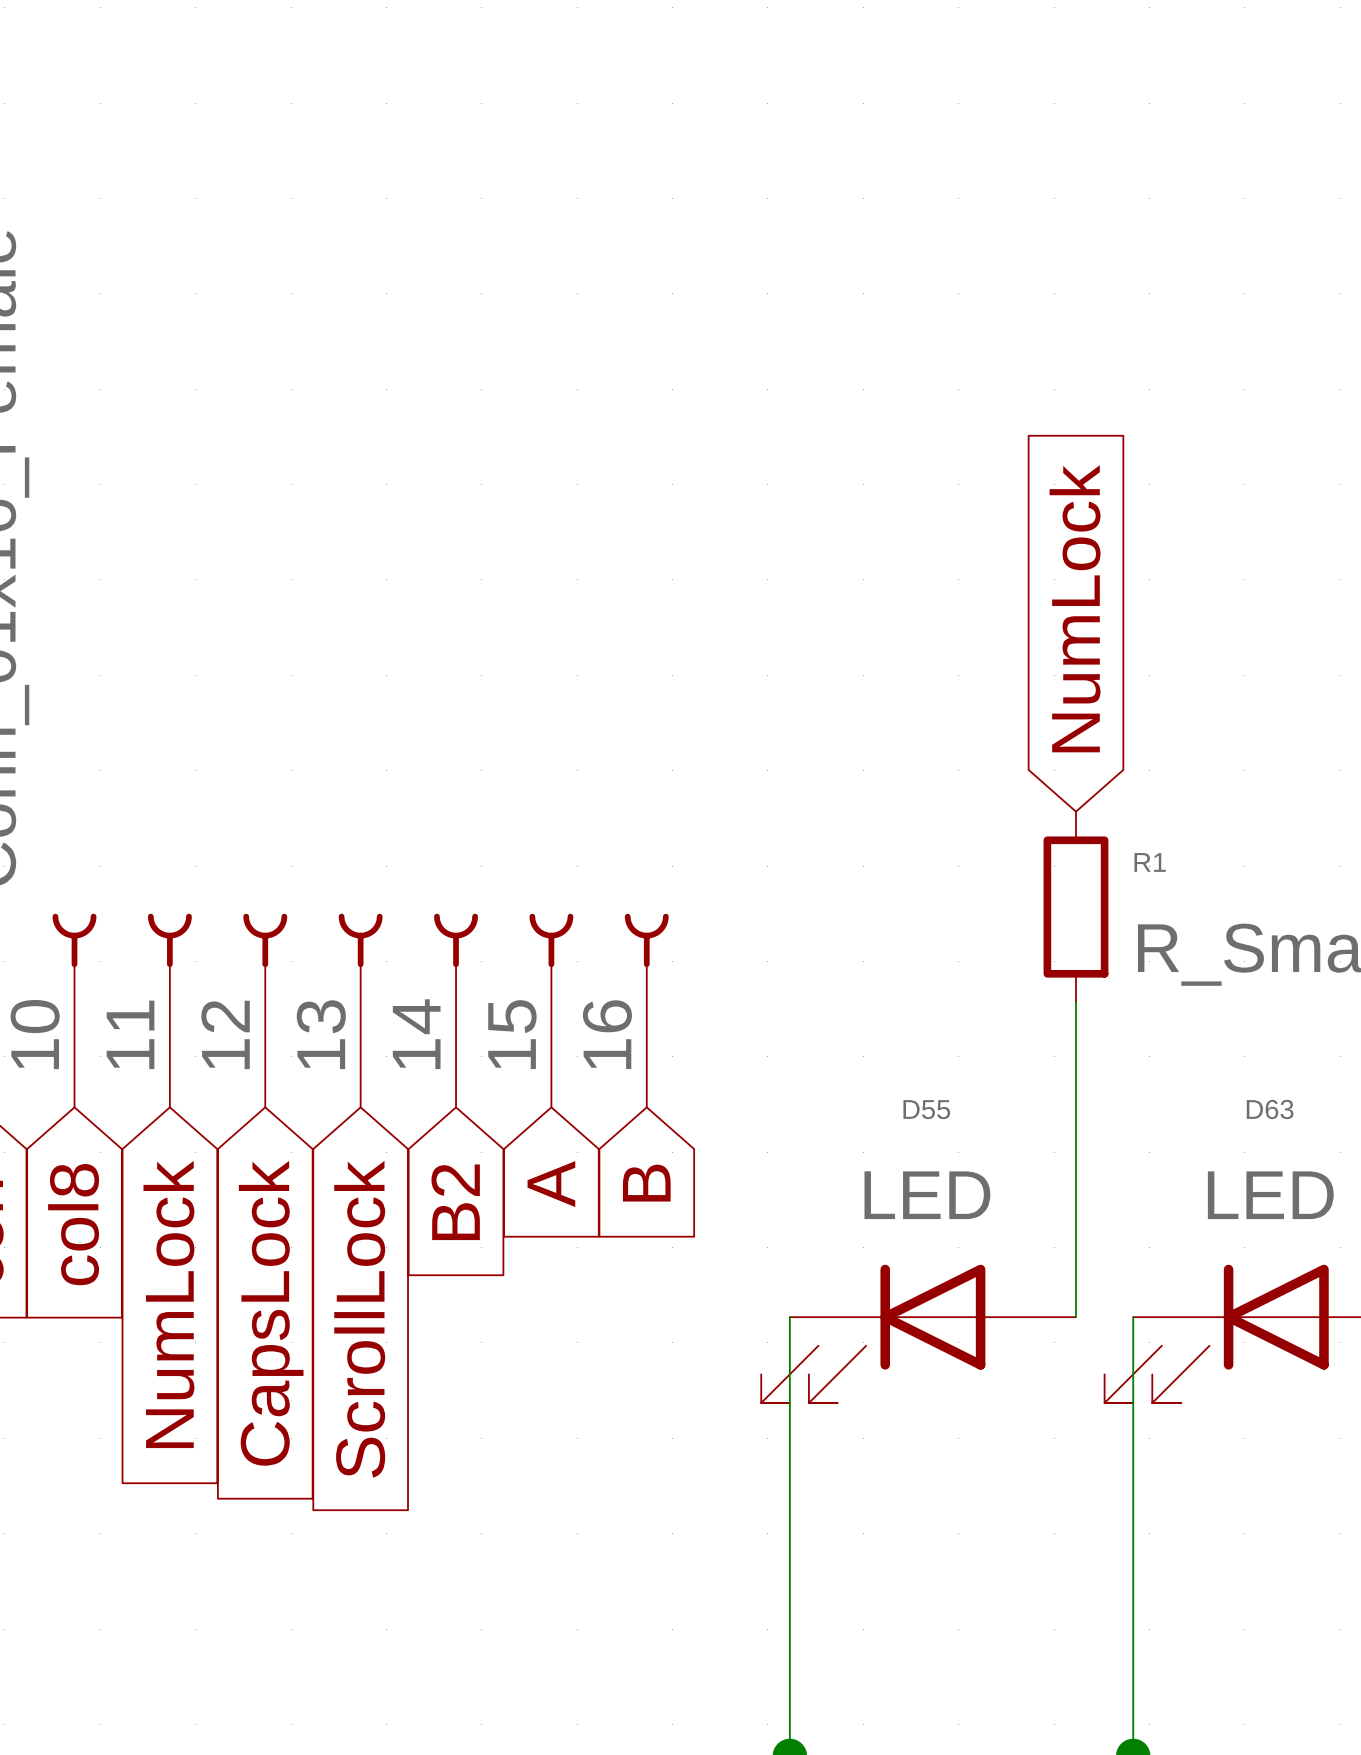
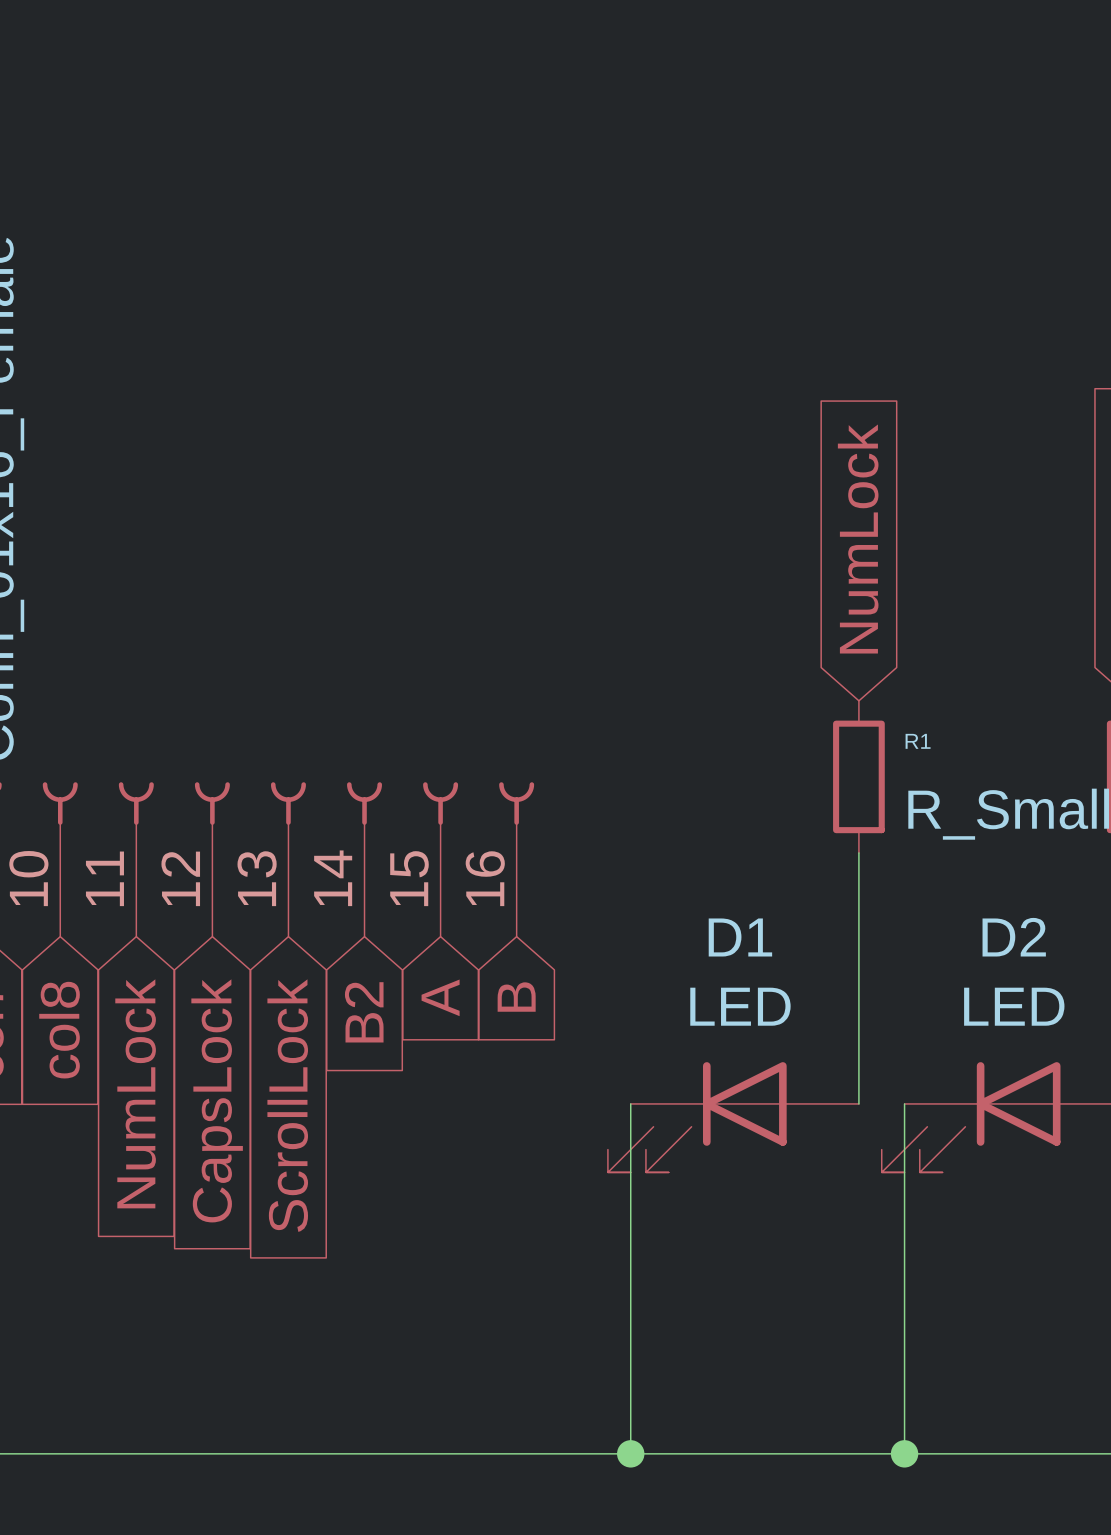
D55 name: D55 (926, 1109) -> D1 (740, 937)
D63 name: D63 (1270, 1109) -> D2 (1014, 937)

